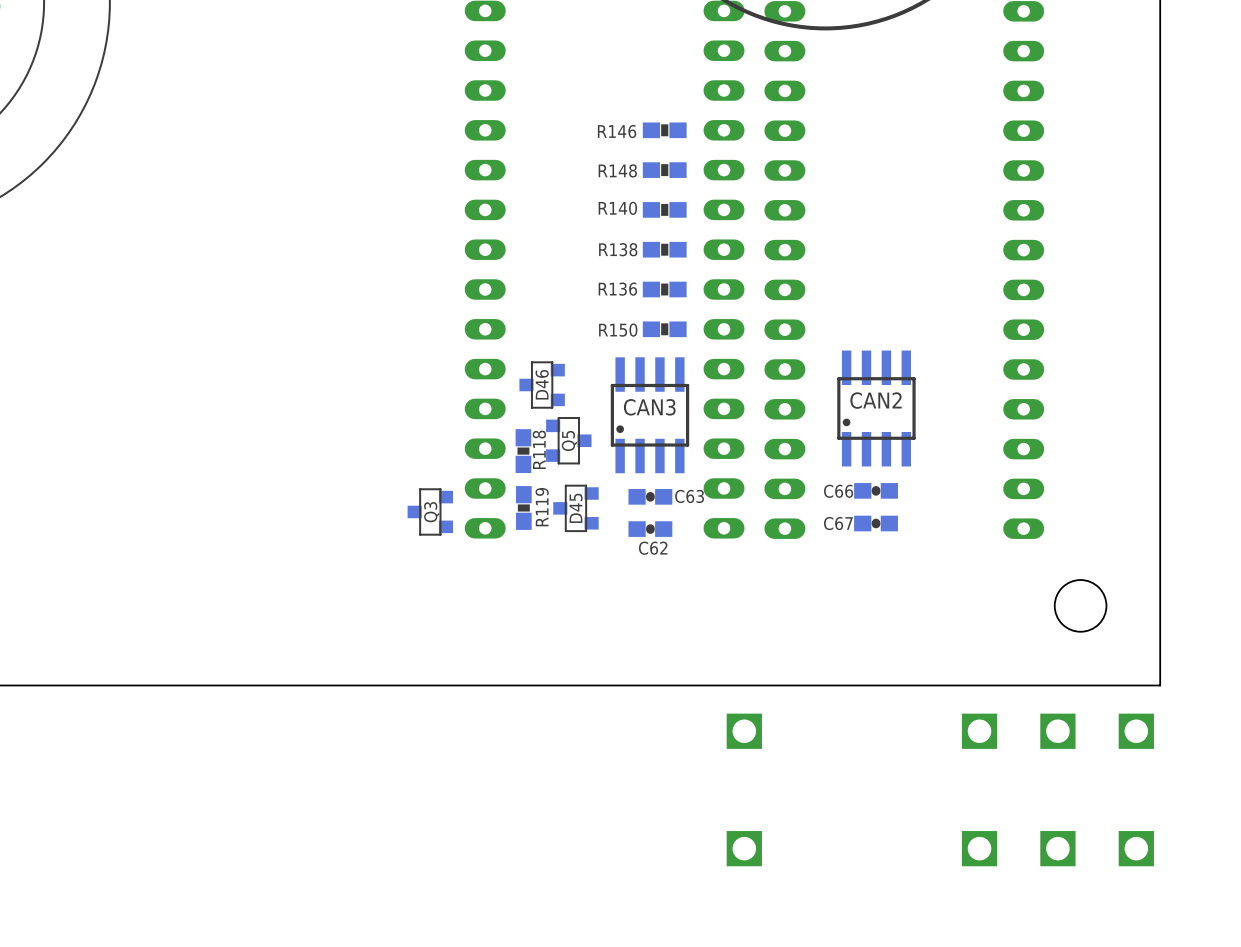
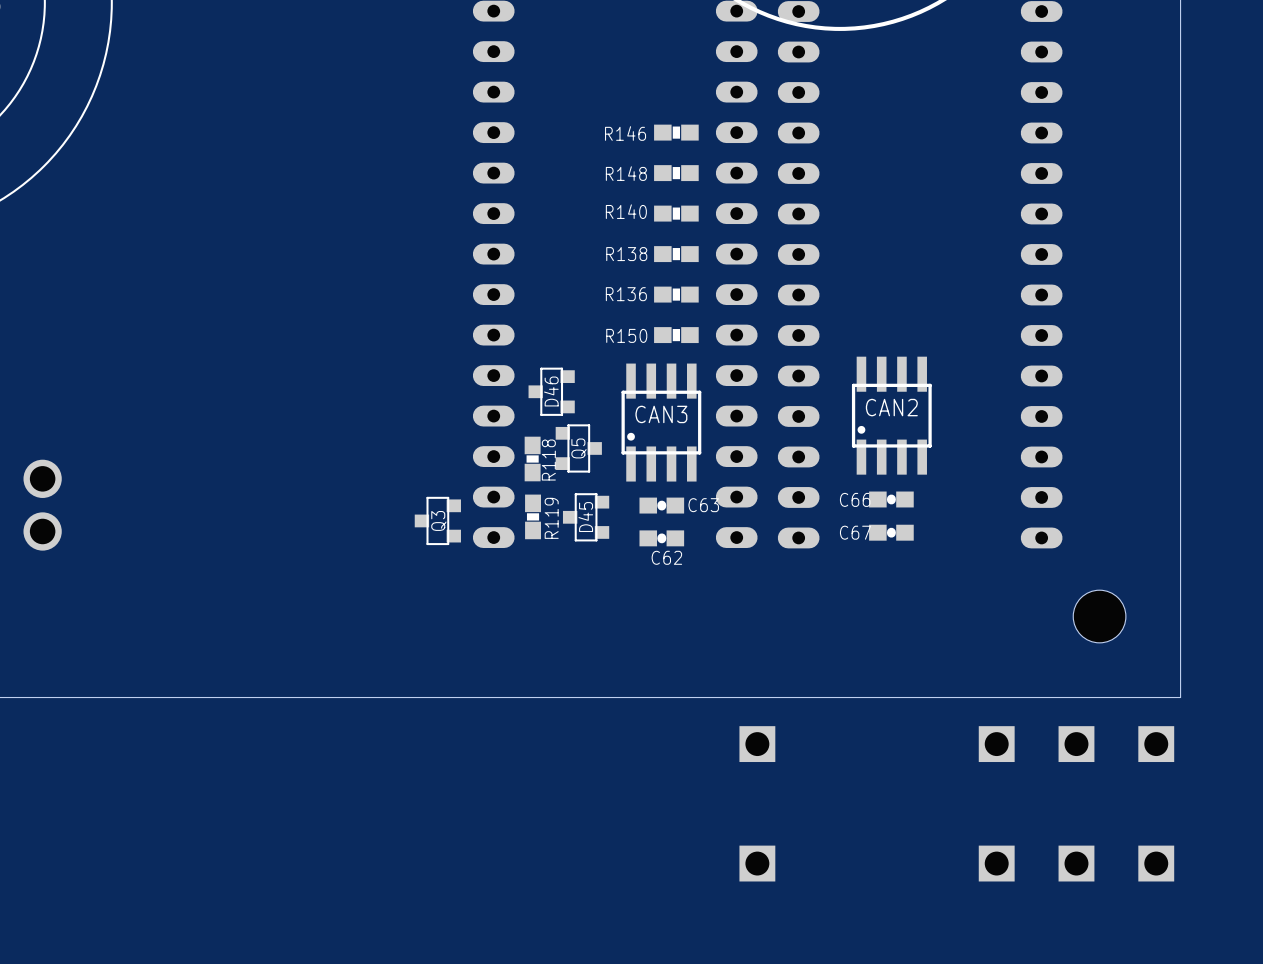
part: none -> (42, 478)
part: none -> (42, 531)

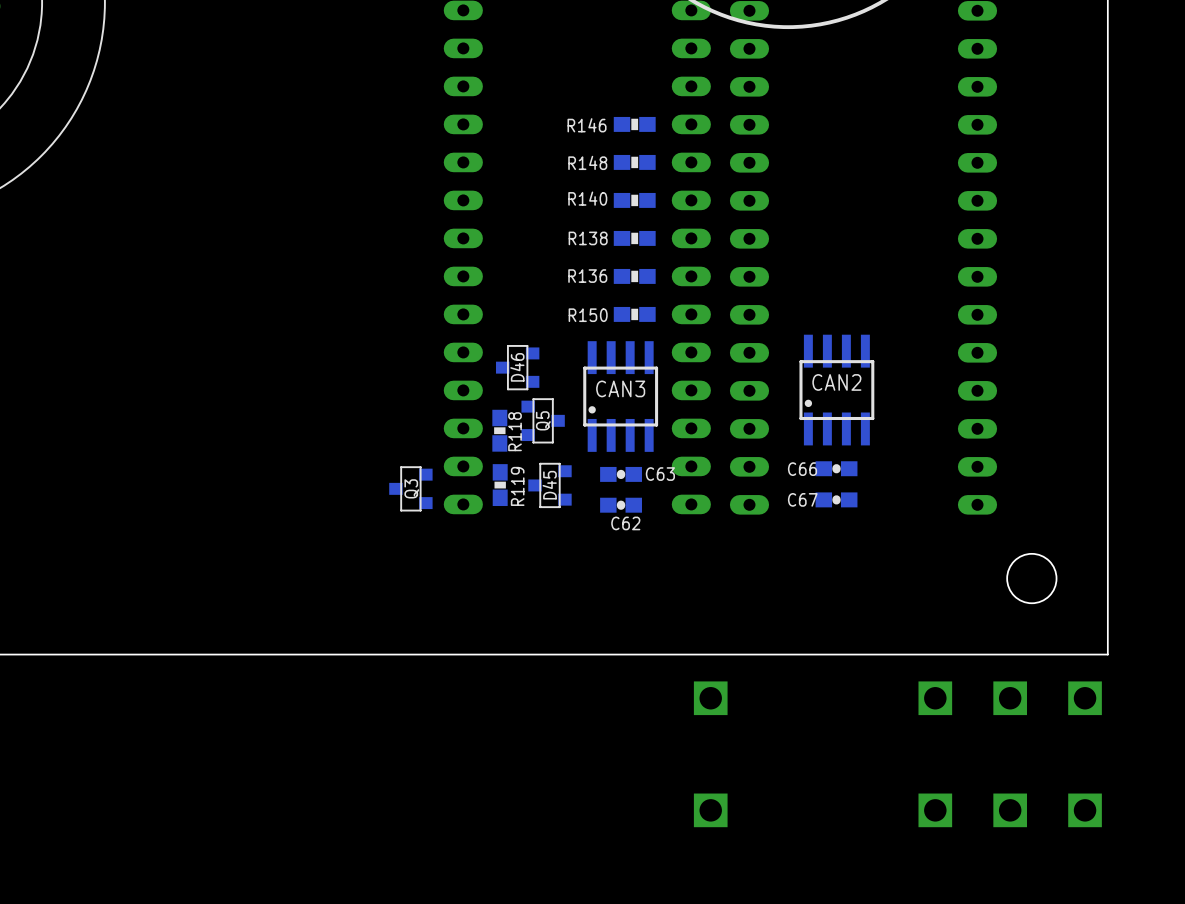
part: (42, 478) -> none
part: (42, 531) -> none

